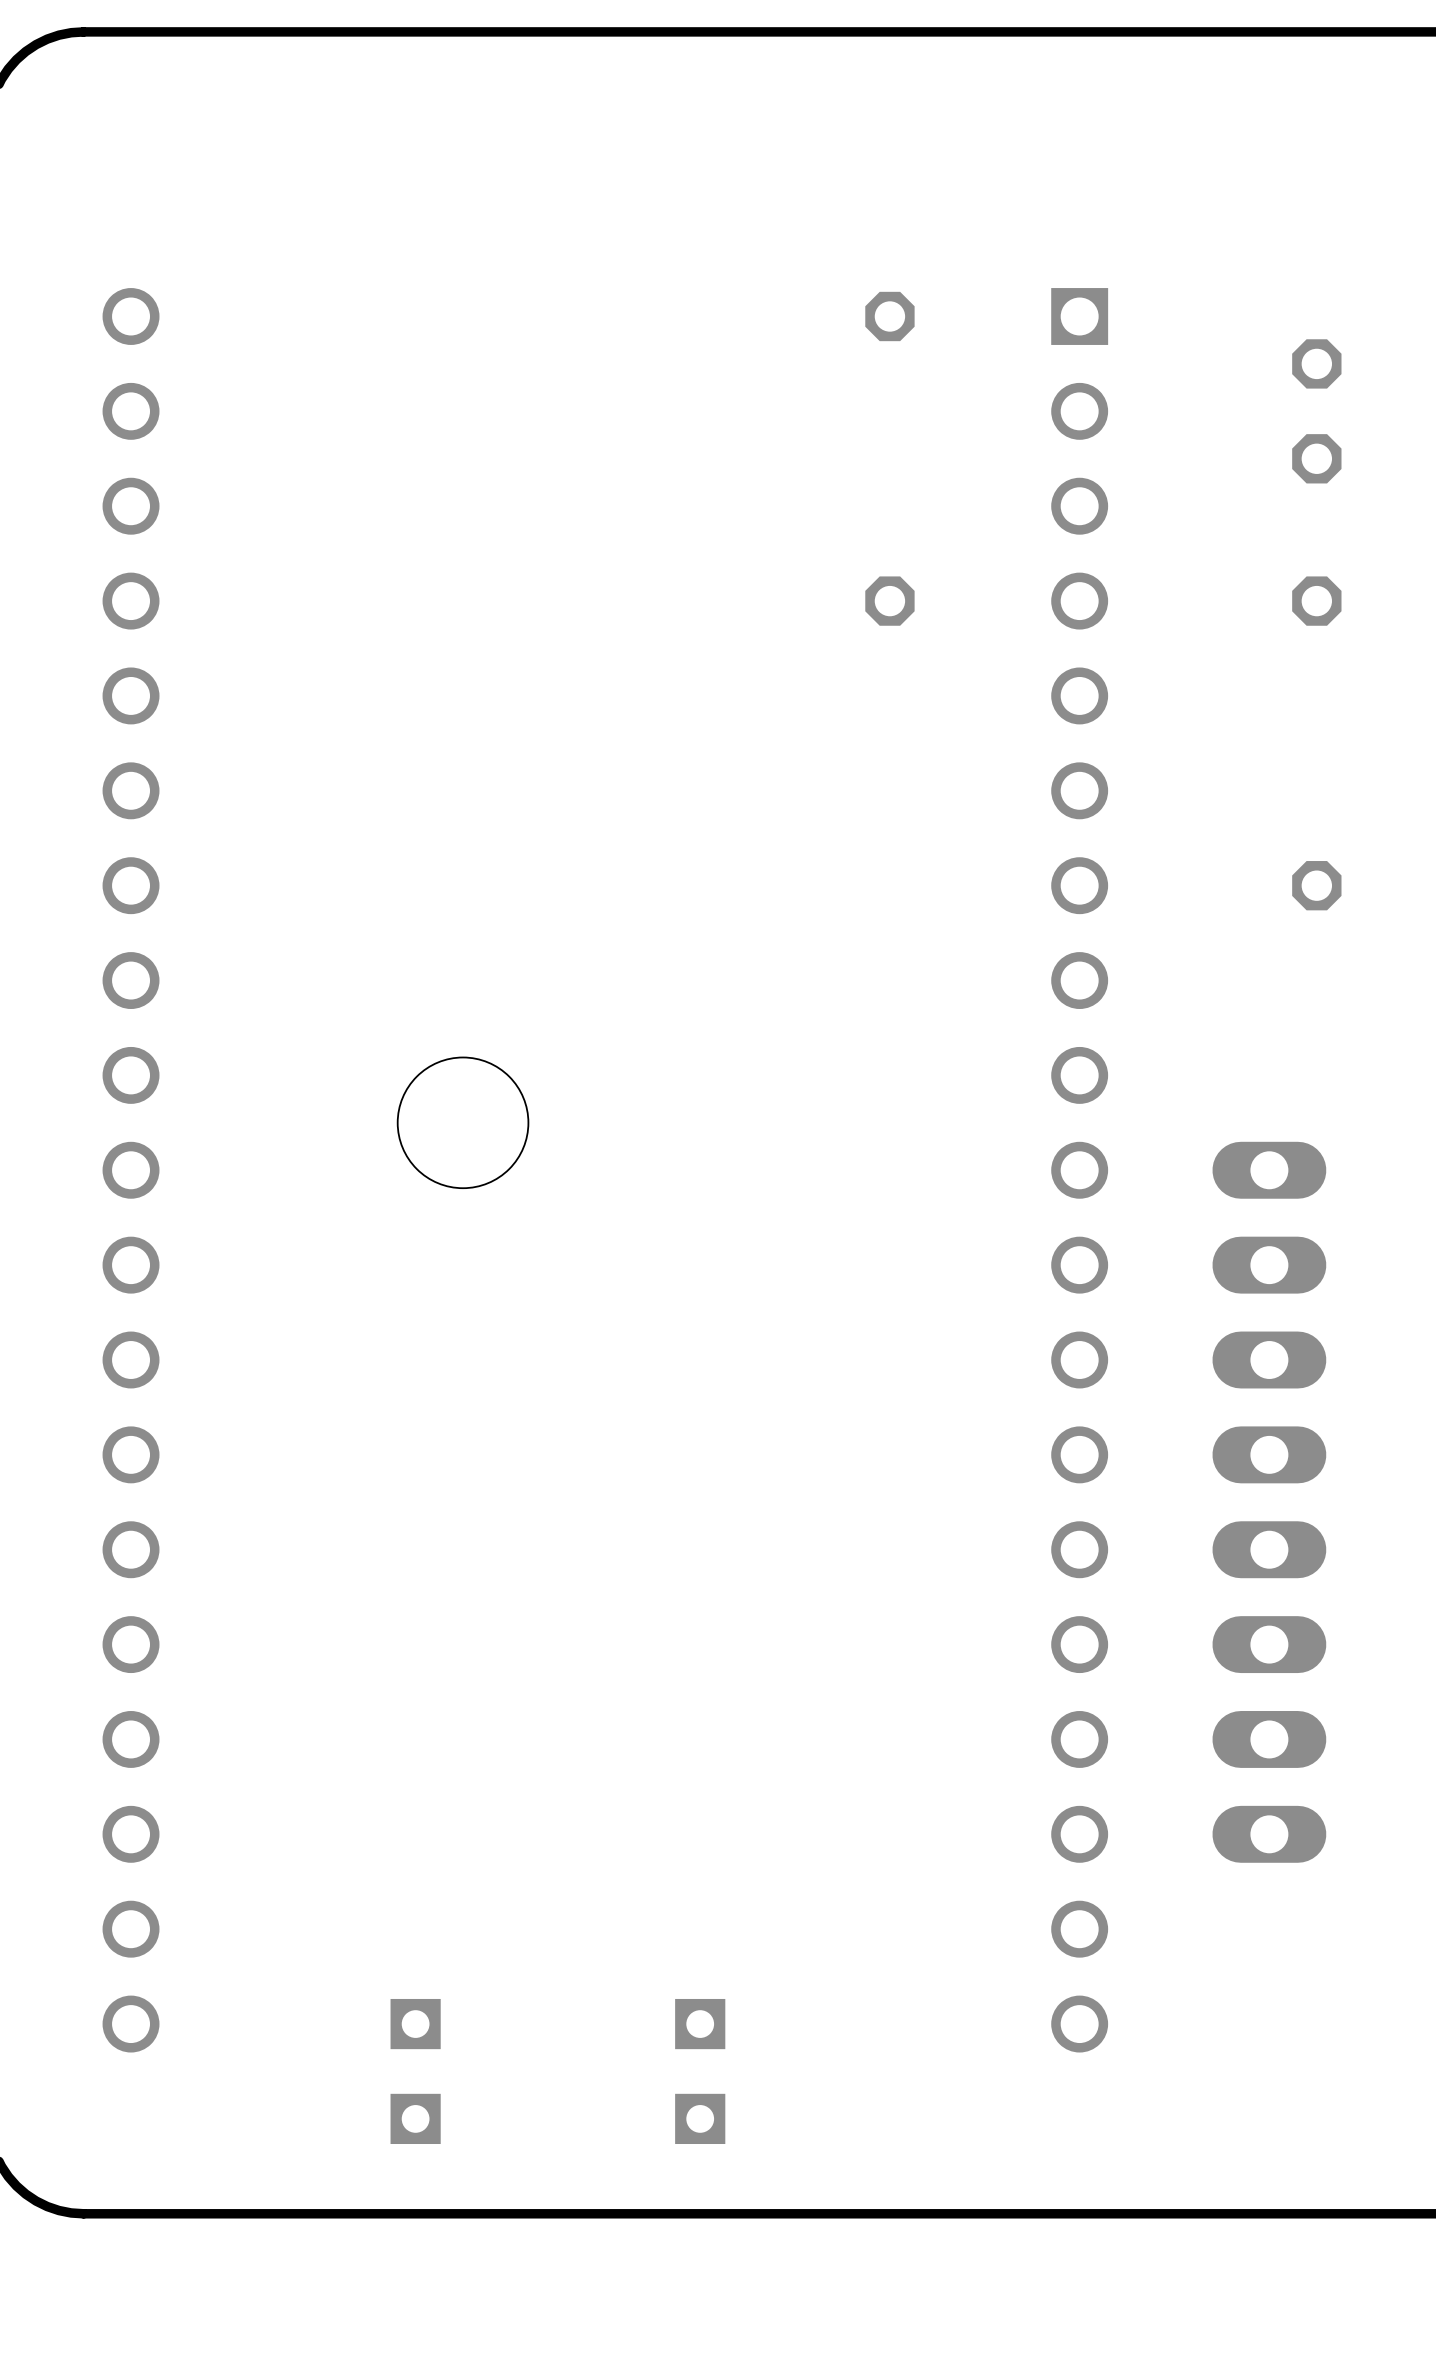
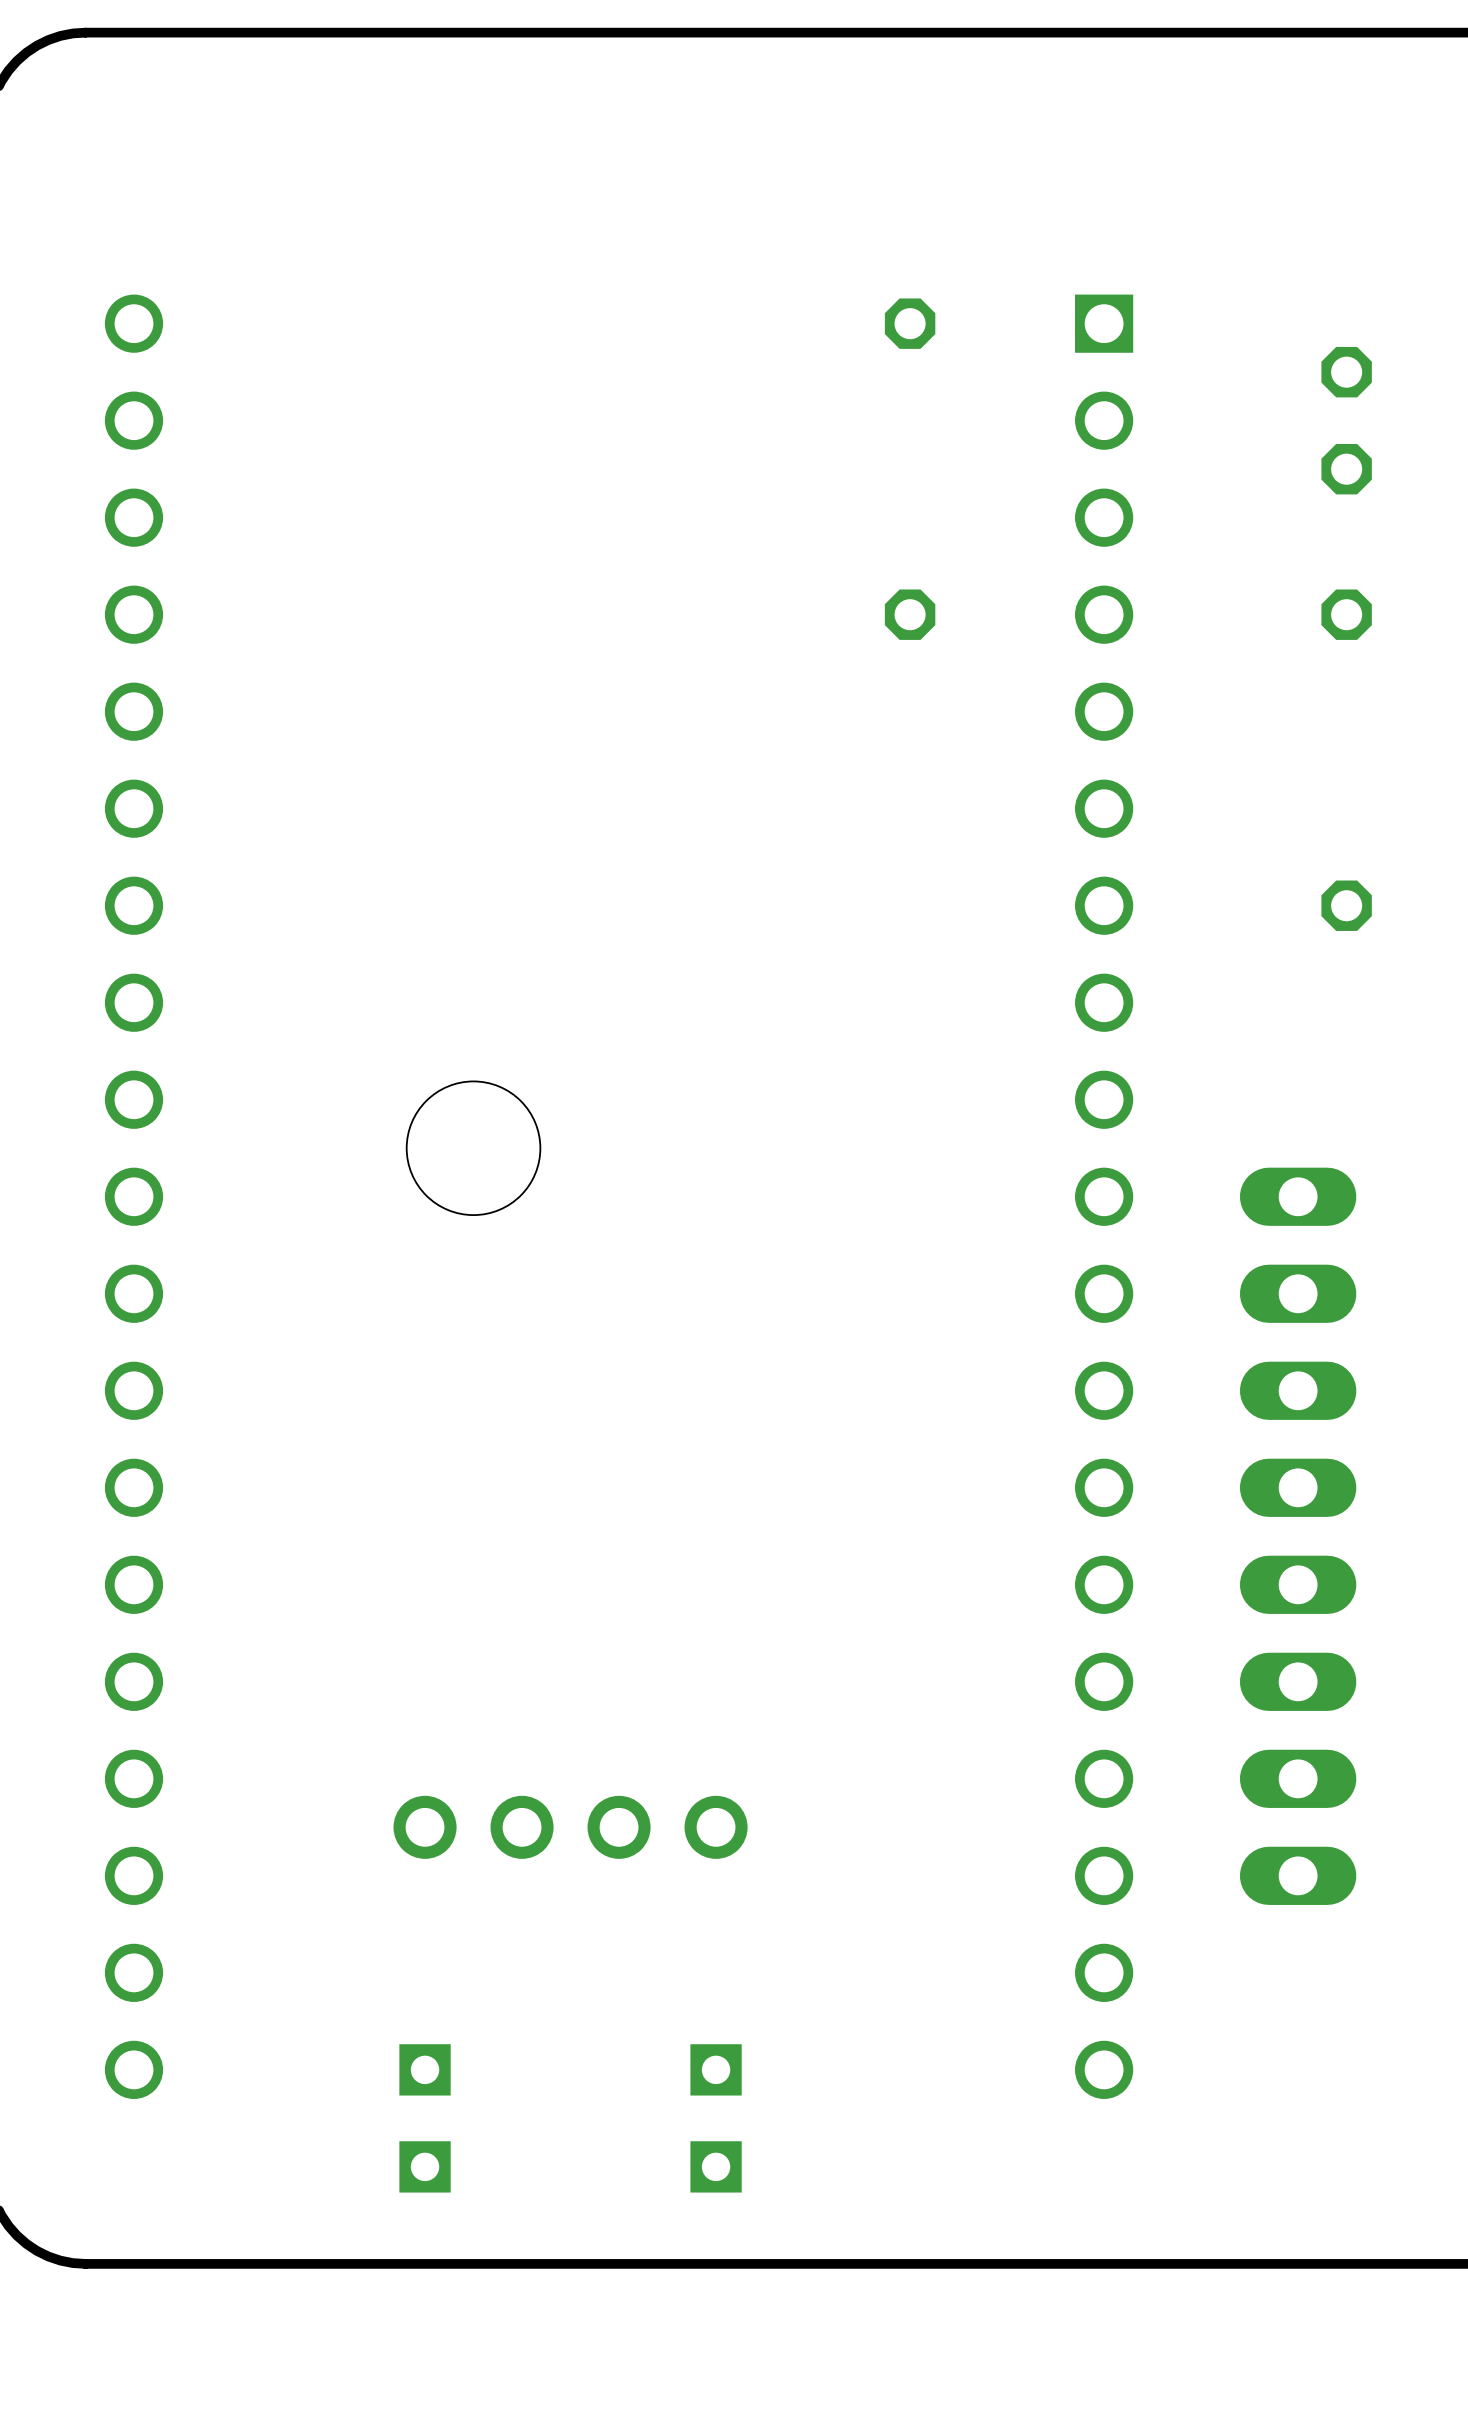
part: none -> (570, 1827)

